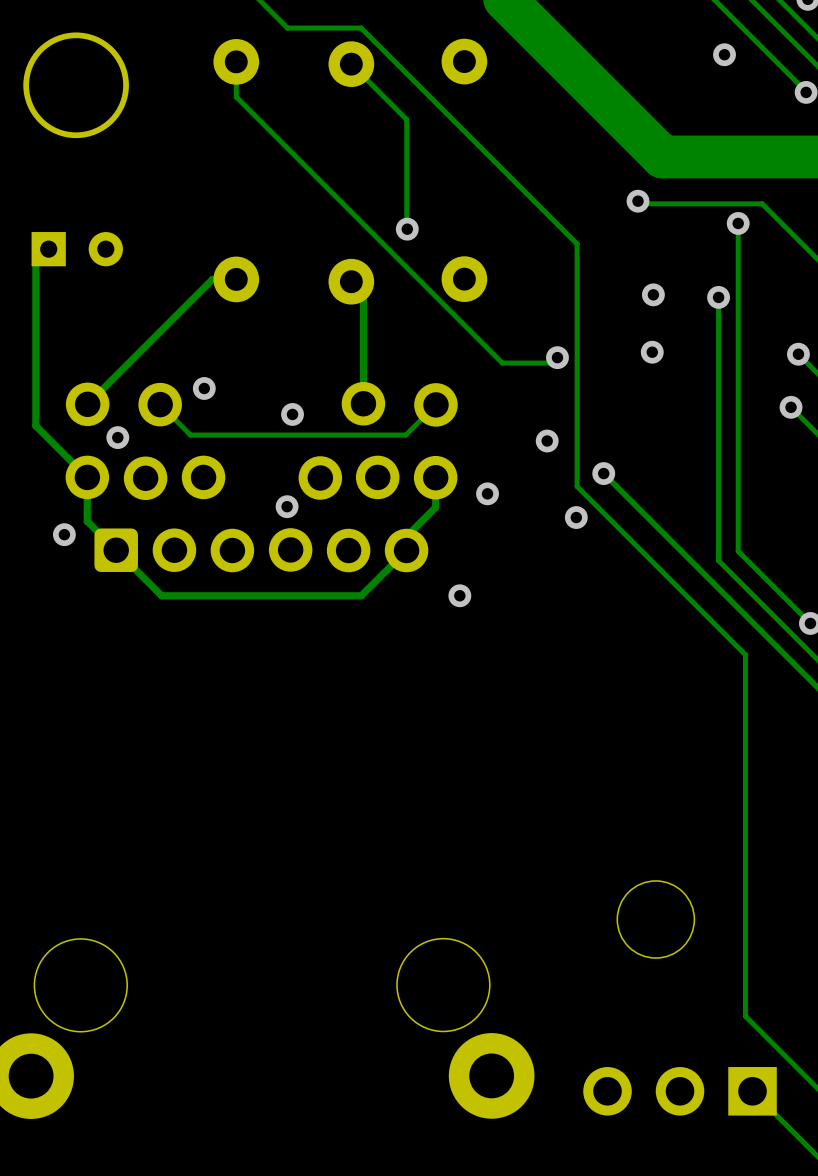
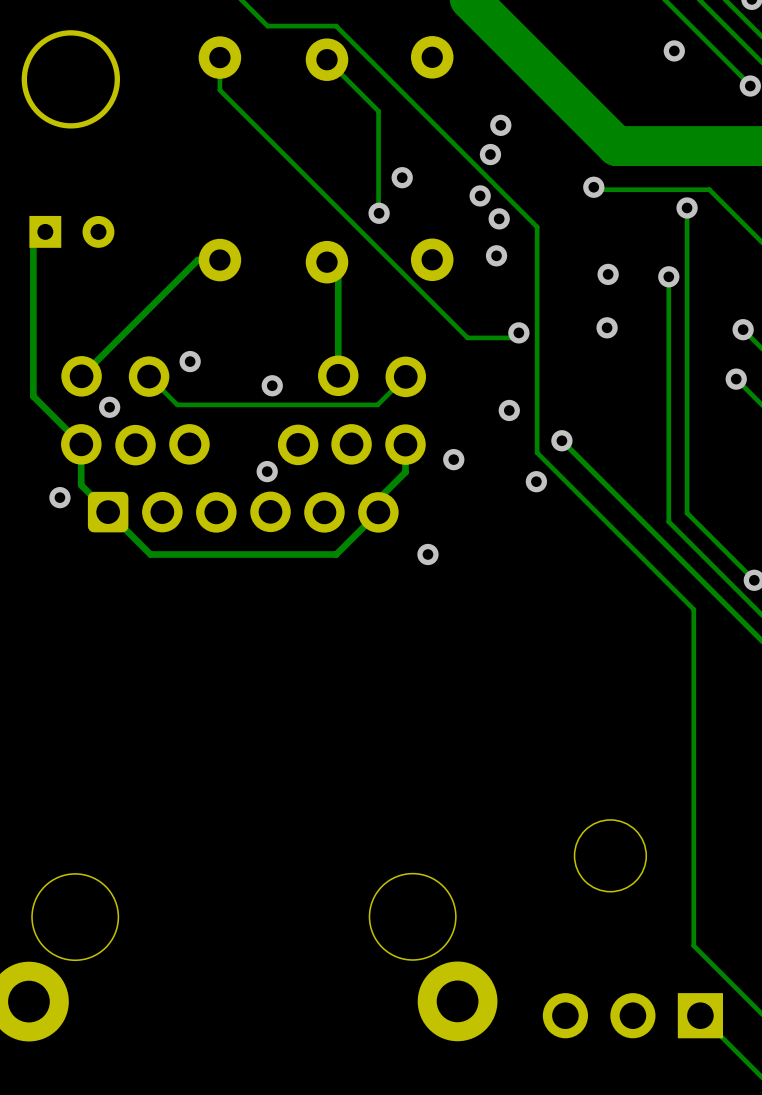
via: none -> (500, 125)
via: none -> (490, 154)
via: none -> (402, 177)
via: none -> (480, 195)
via: none -> (499, 218)
via: none -> (496, 255)

